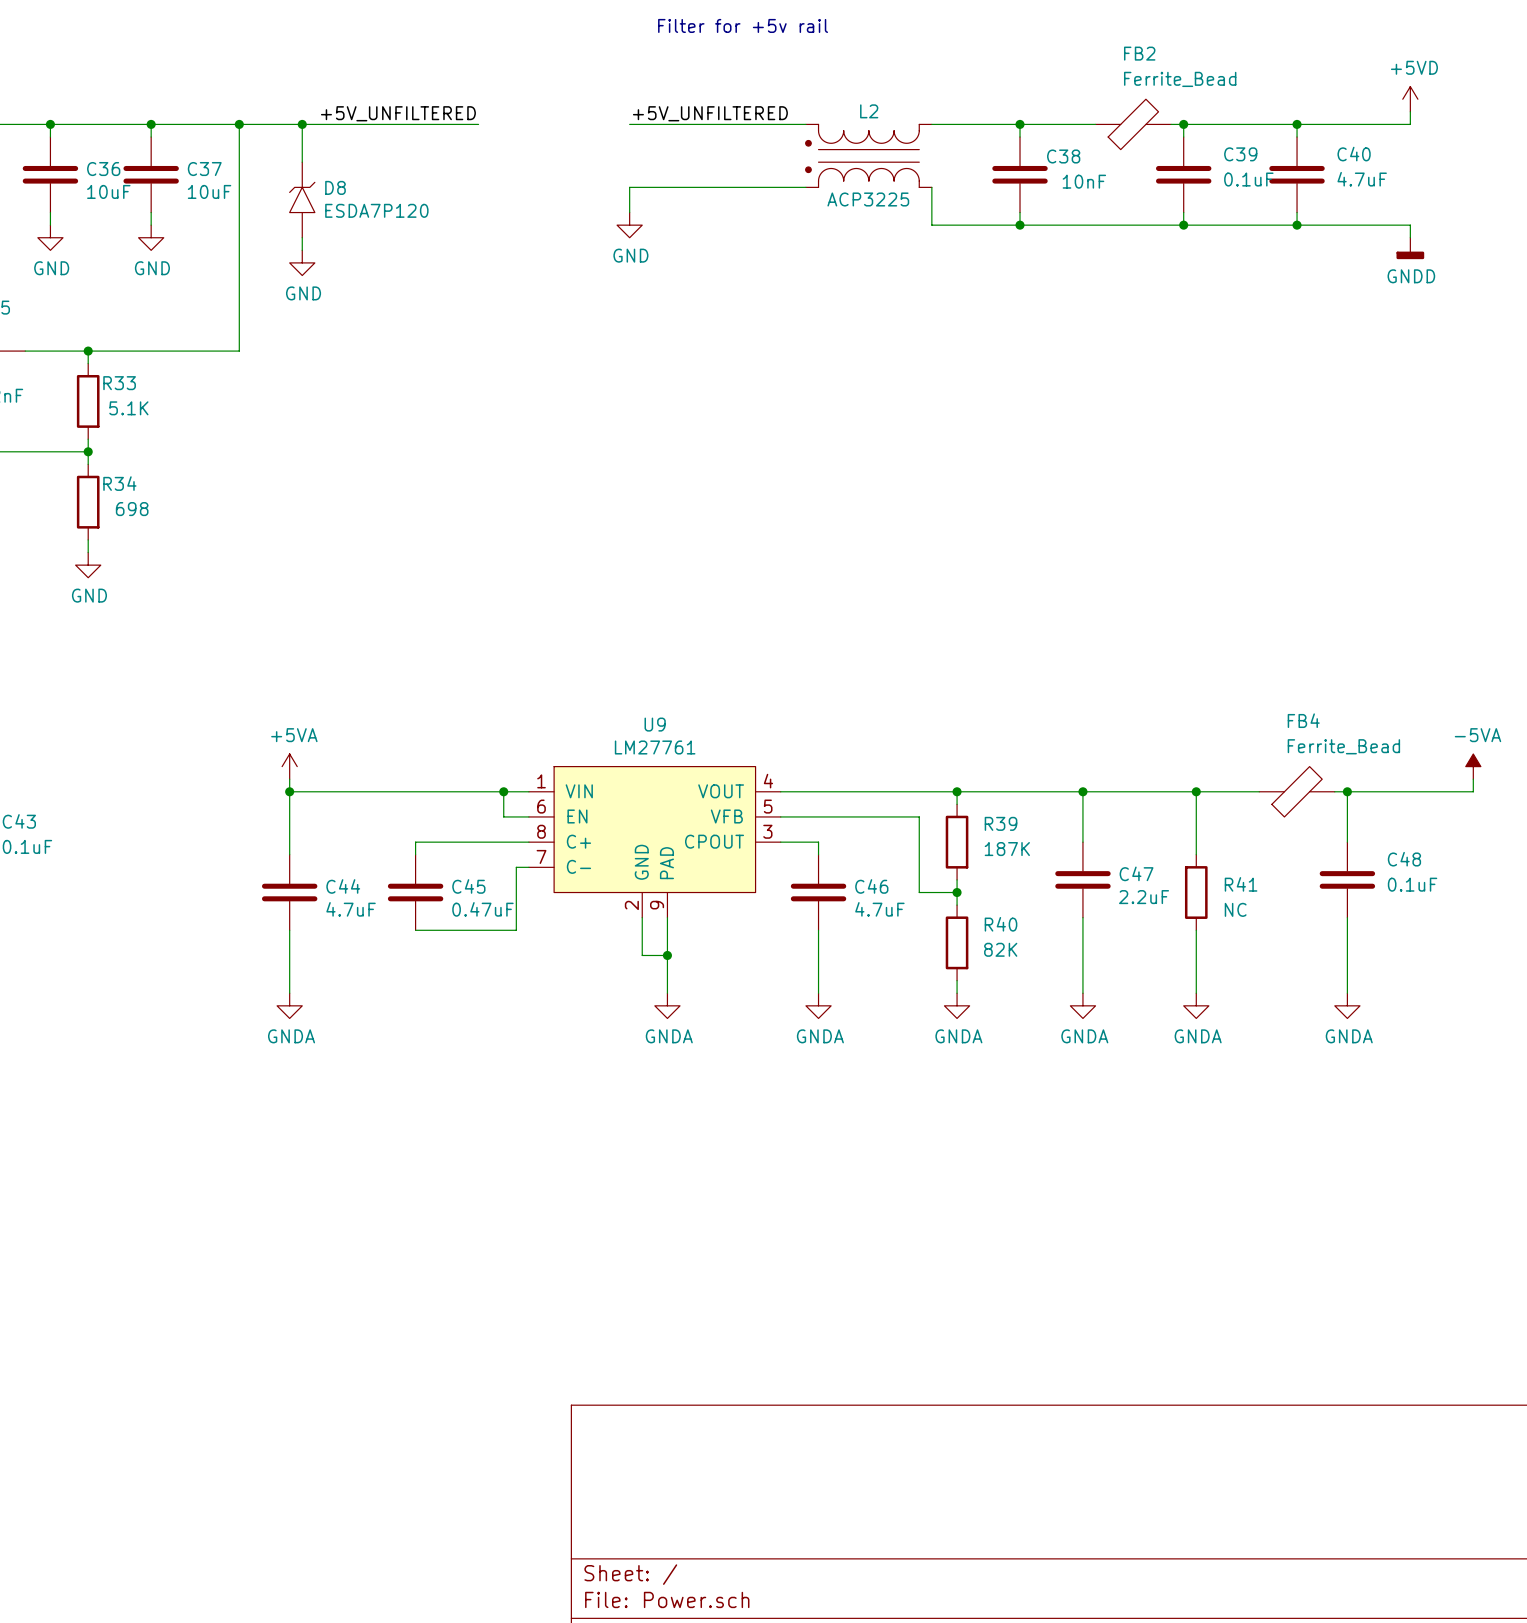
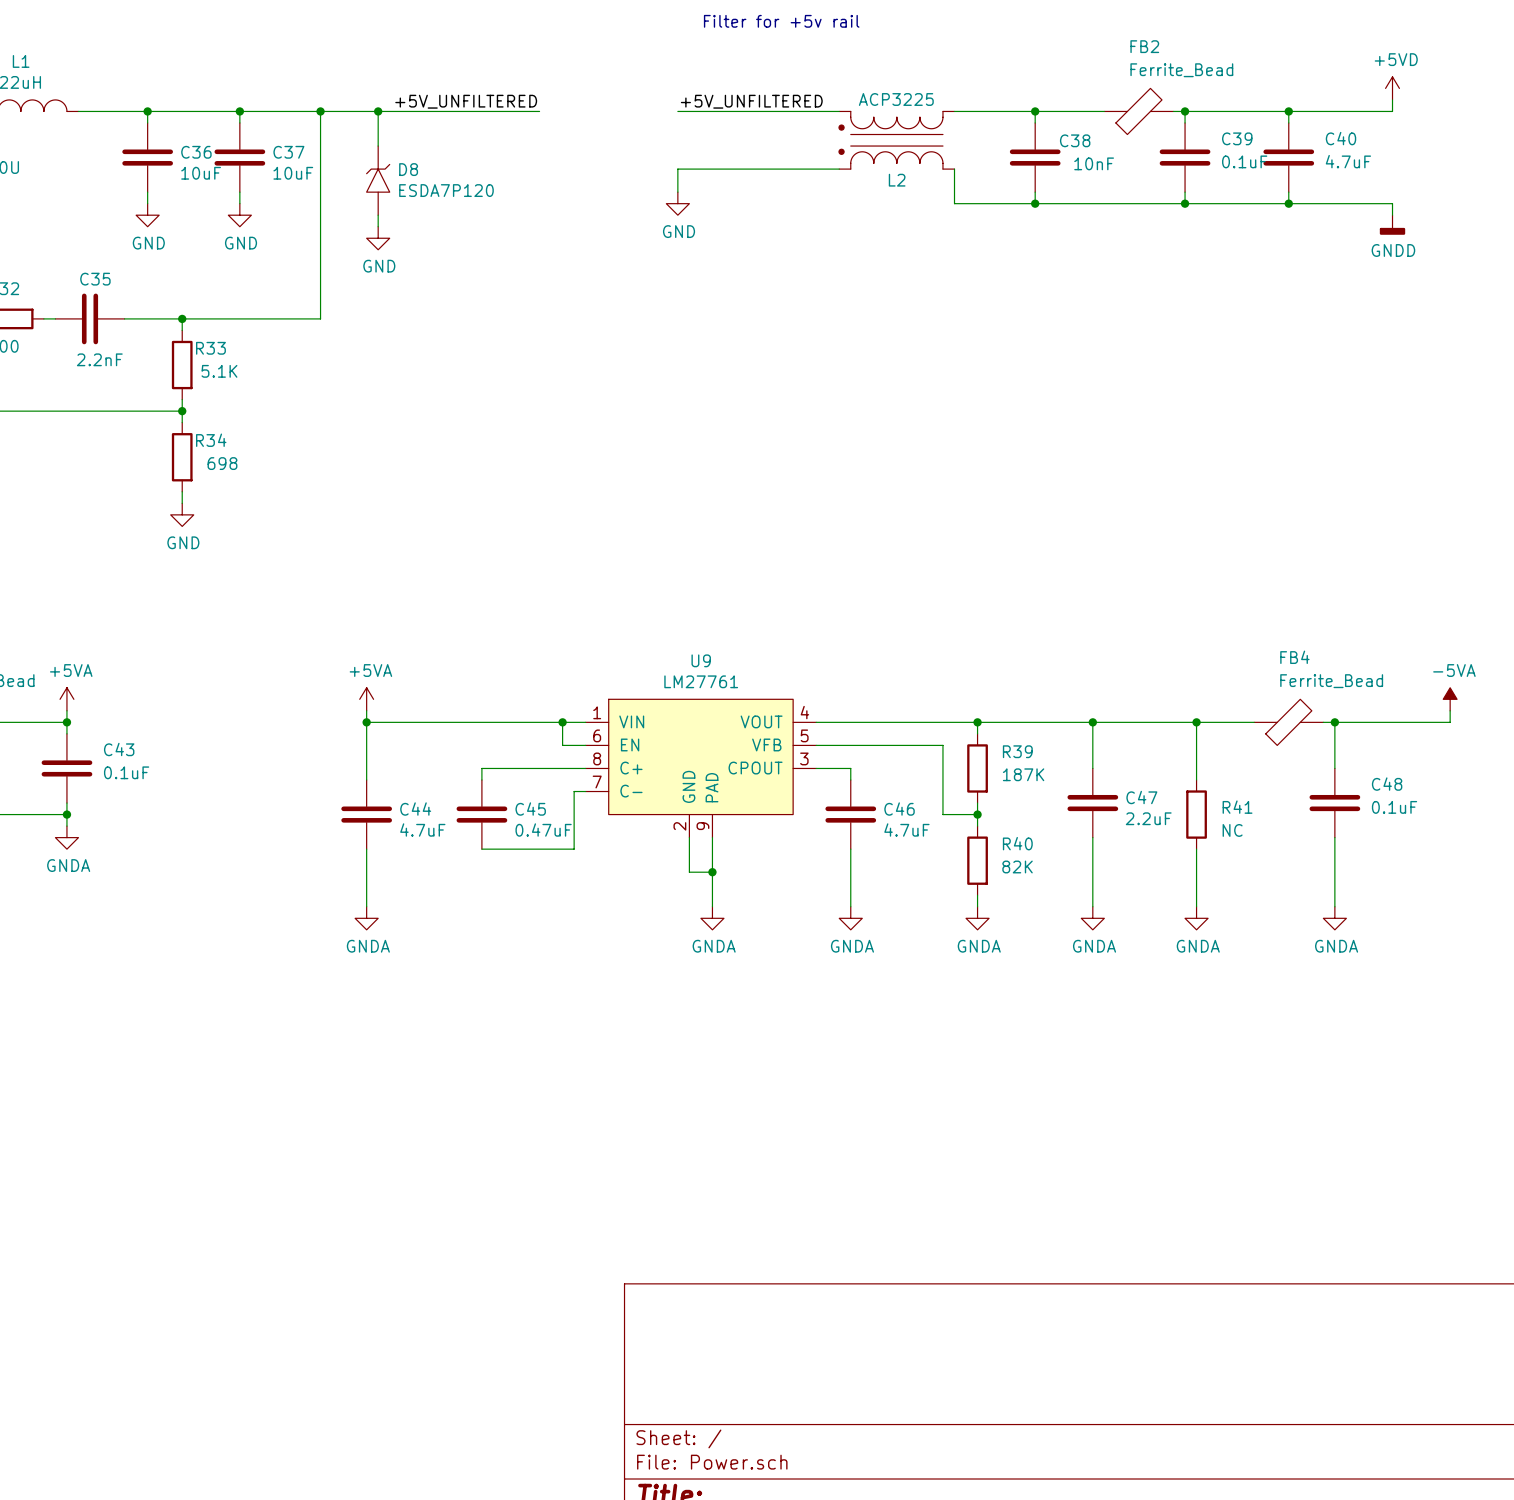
L2 flip: as is (862, 155) -> up-down (890, 140)

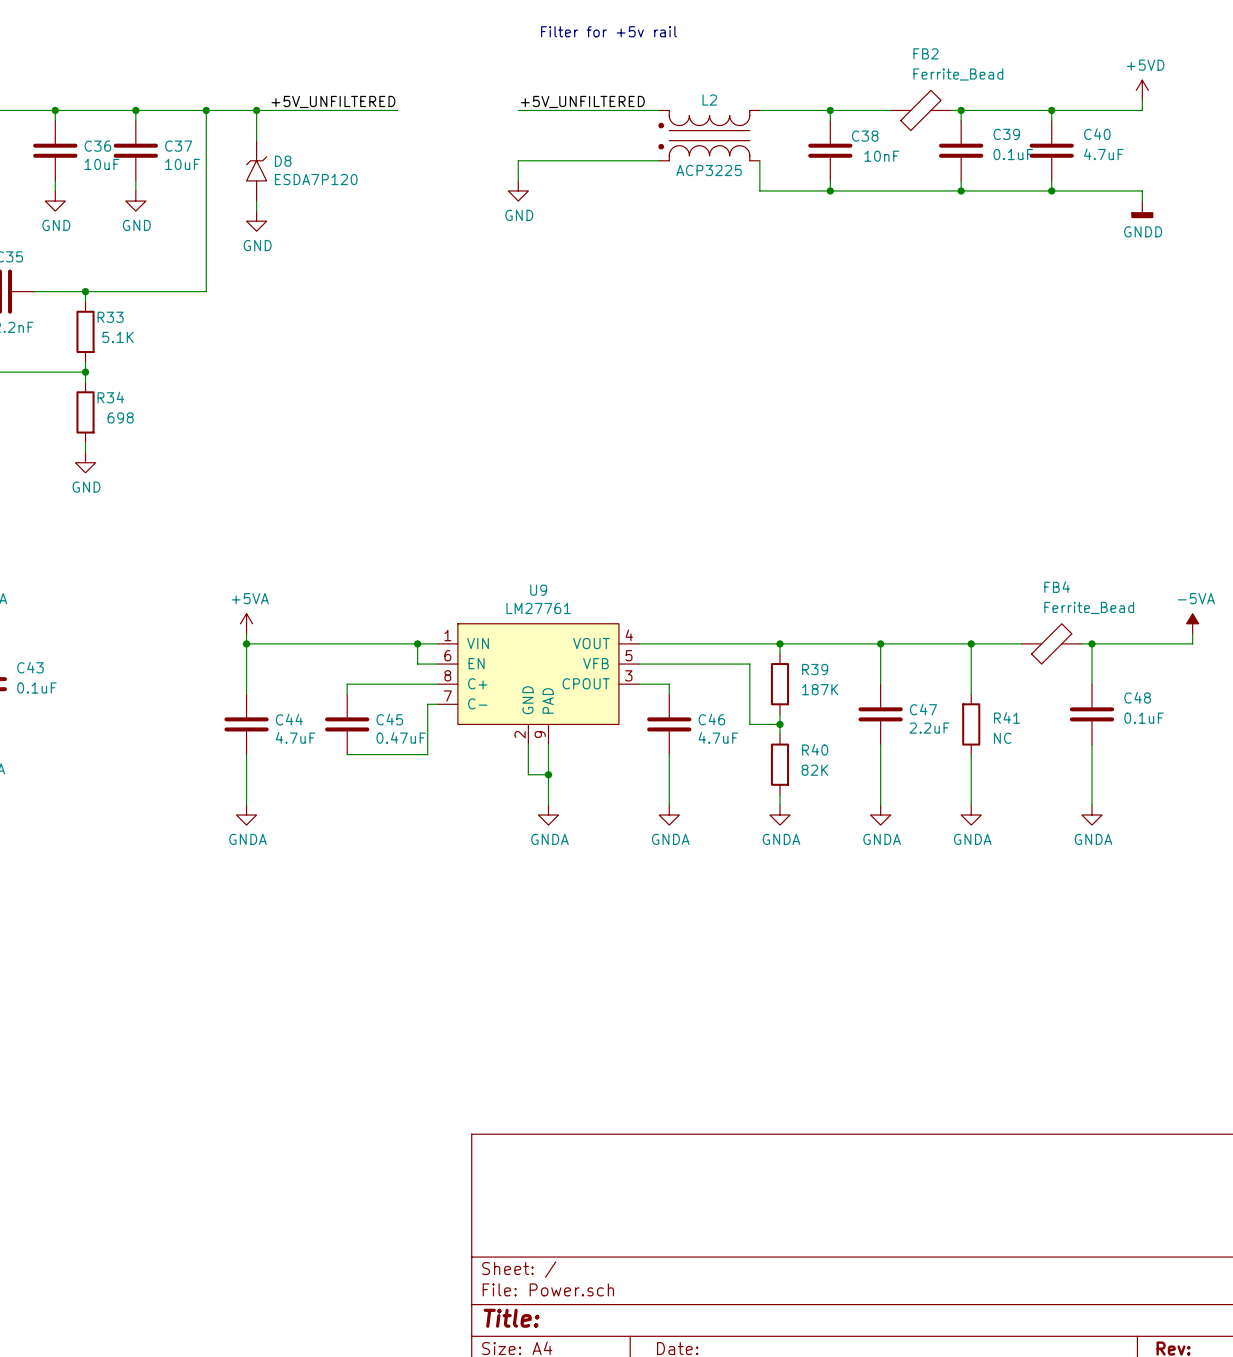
L2 flip: as is (890, 140) -> up-down (704, 135)

